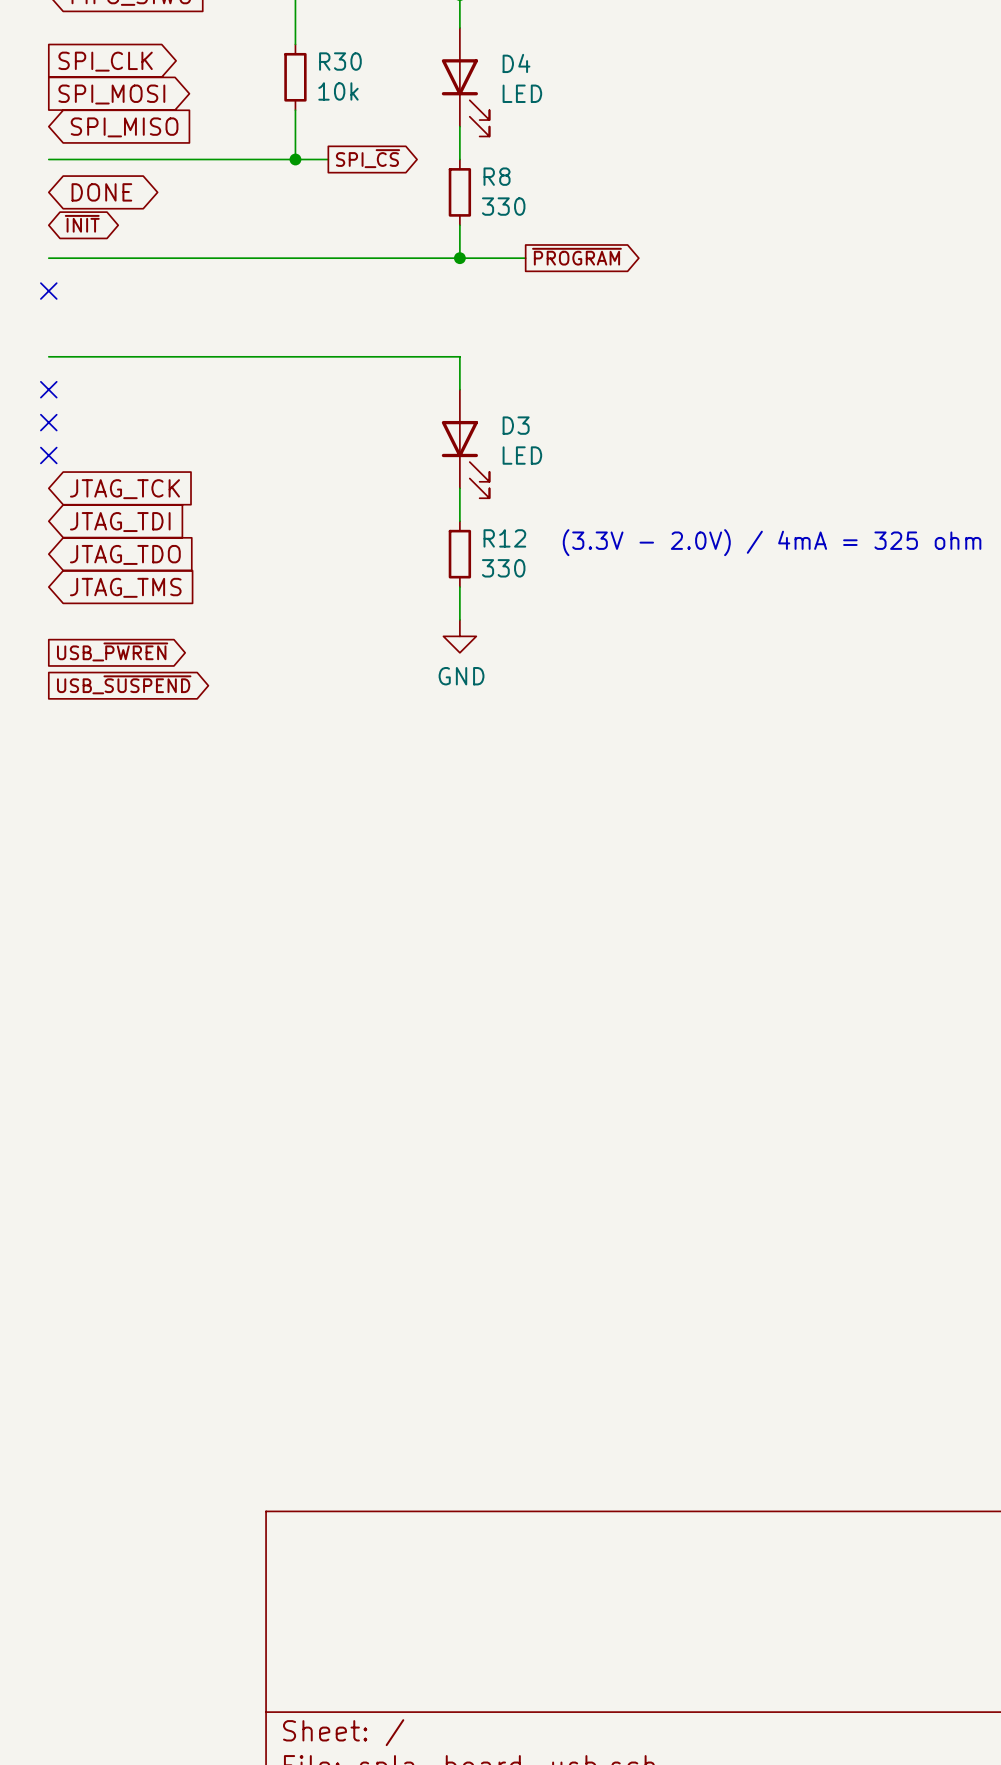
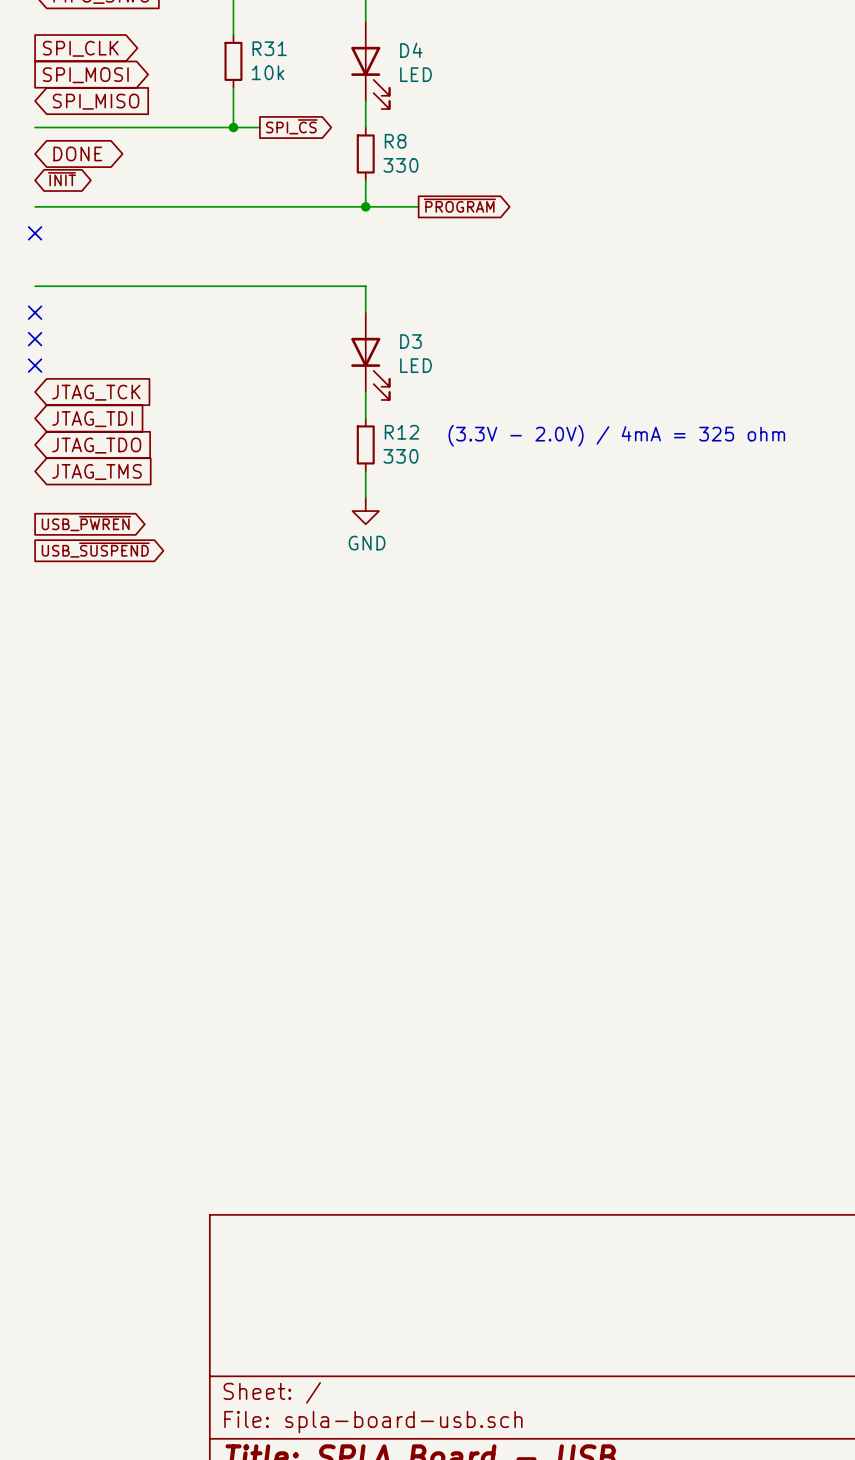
R30 name: R30 (340, 61) -> R31 (269, 48)

